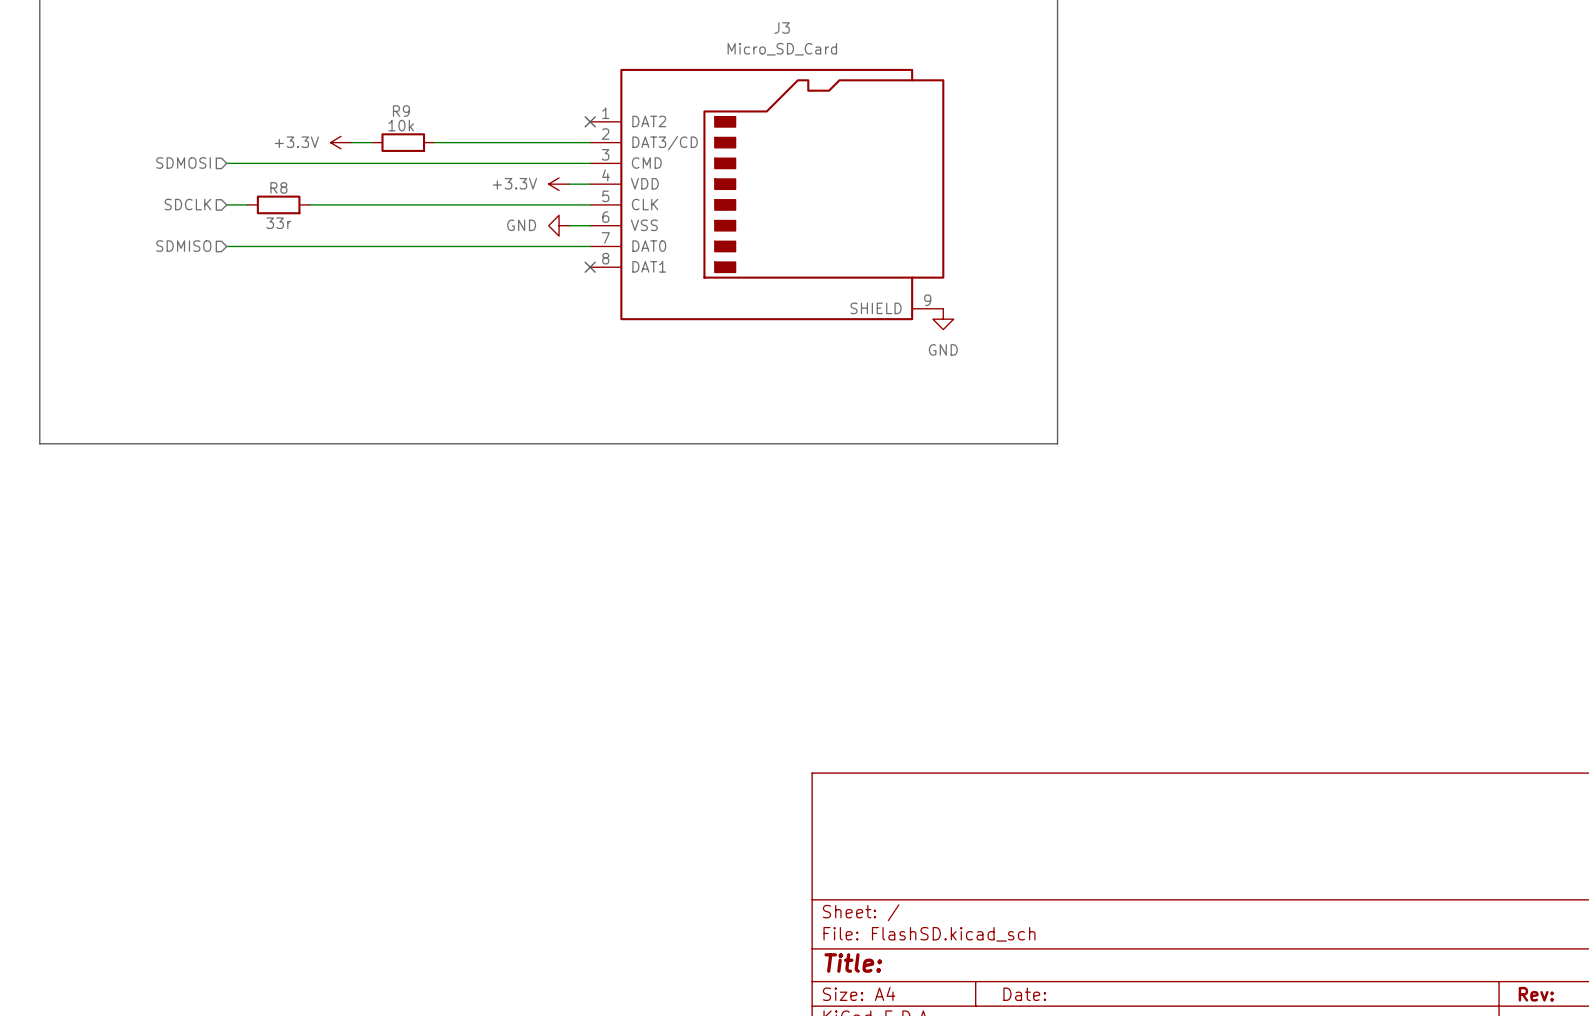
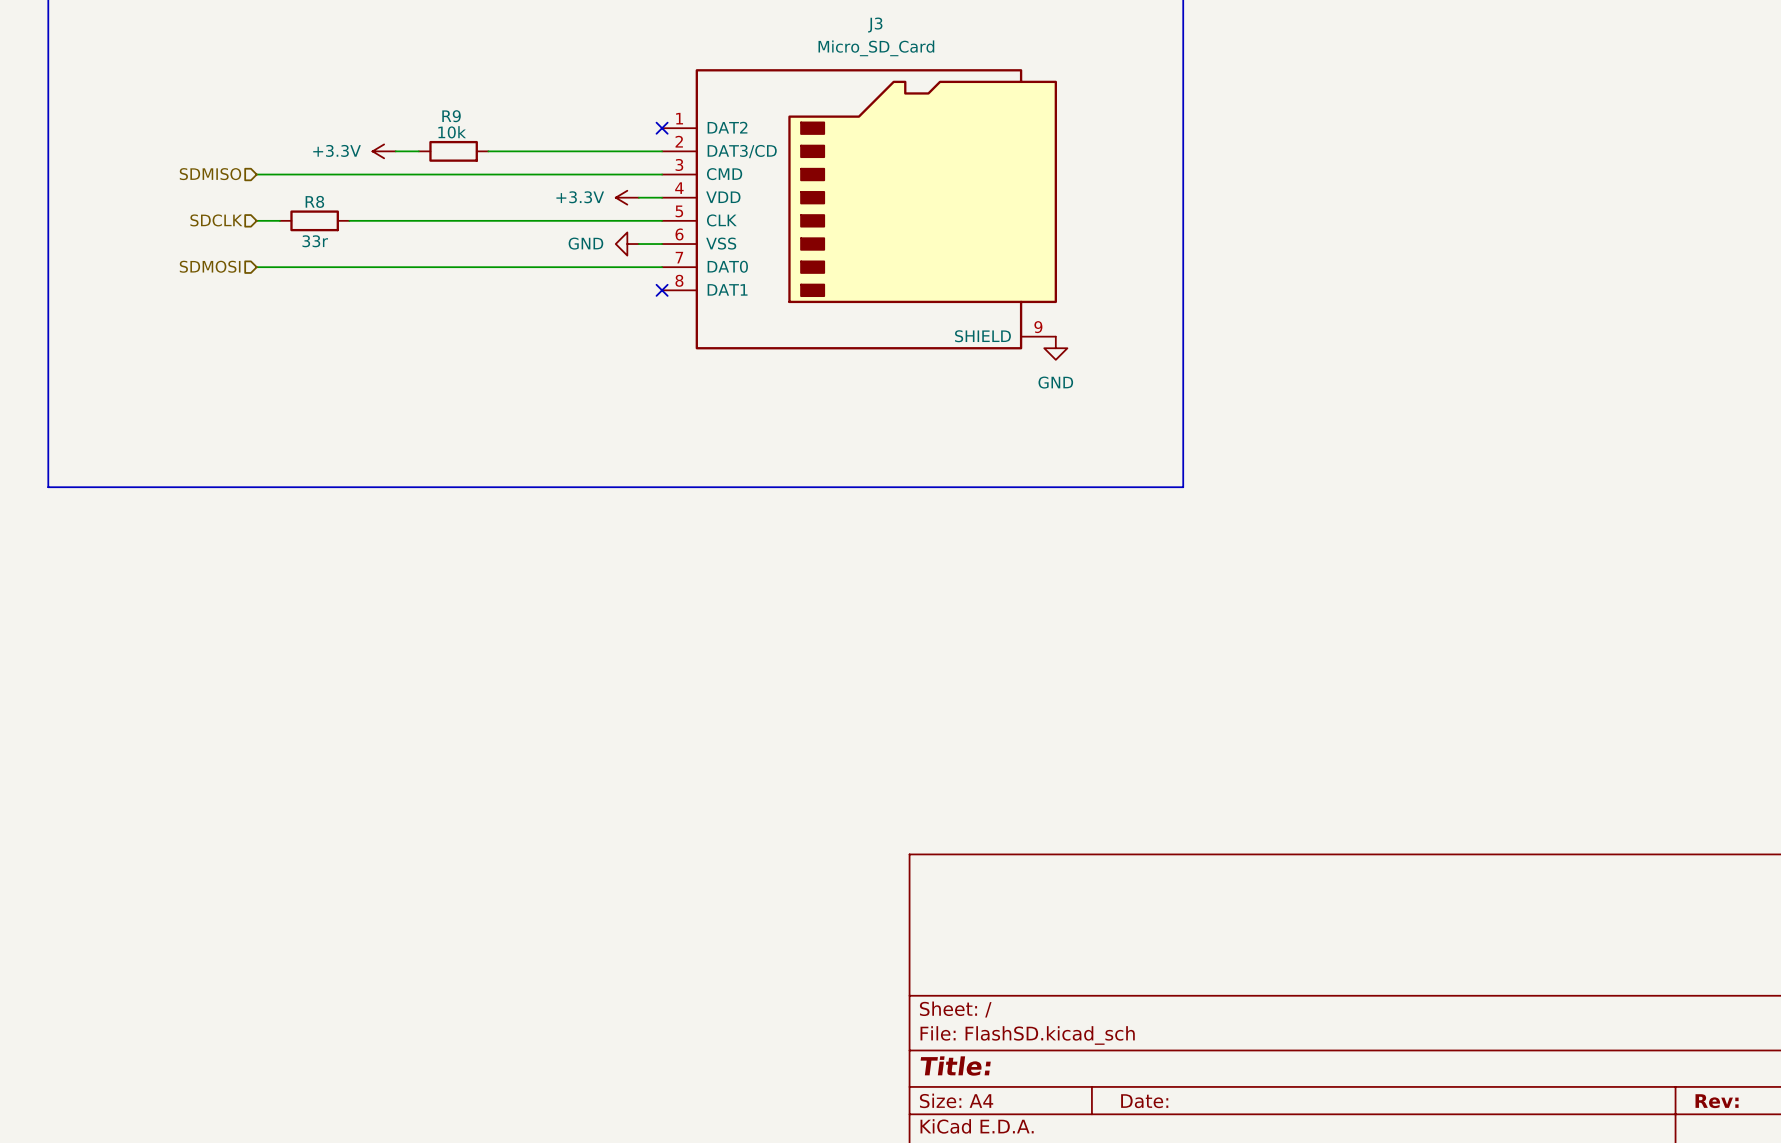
hierarchical label: SDMOSI (183, 163) -> SDMISO (210, 174)
hierarchical label: SDMISO (183, 246) -> SDMOSI (210, 266)

